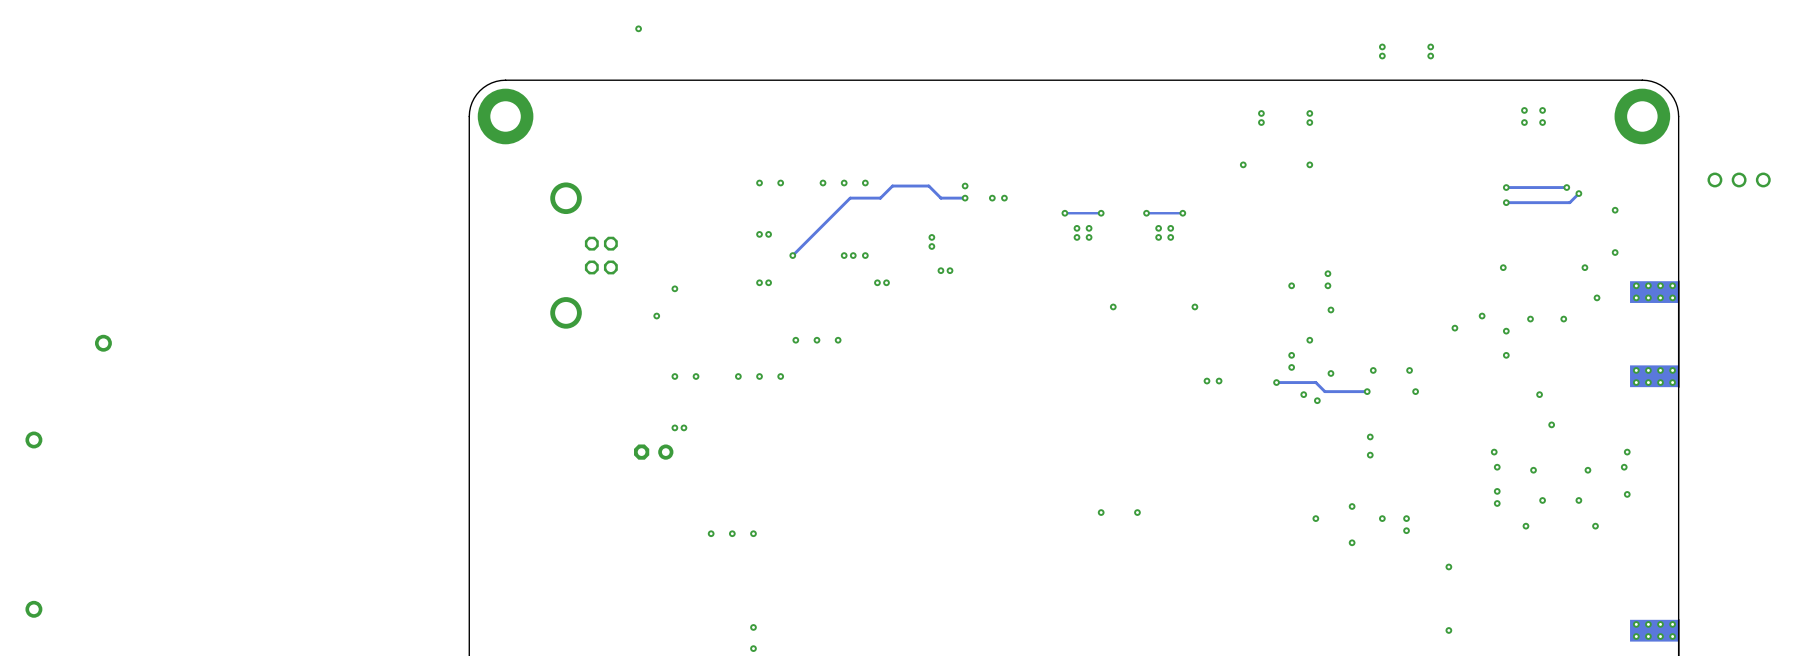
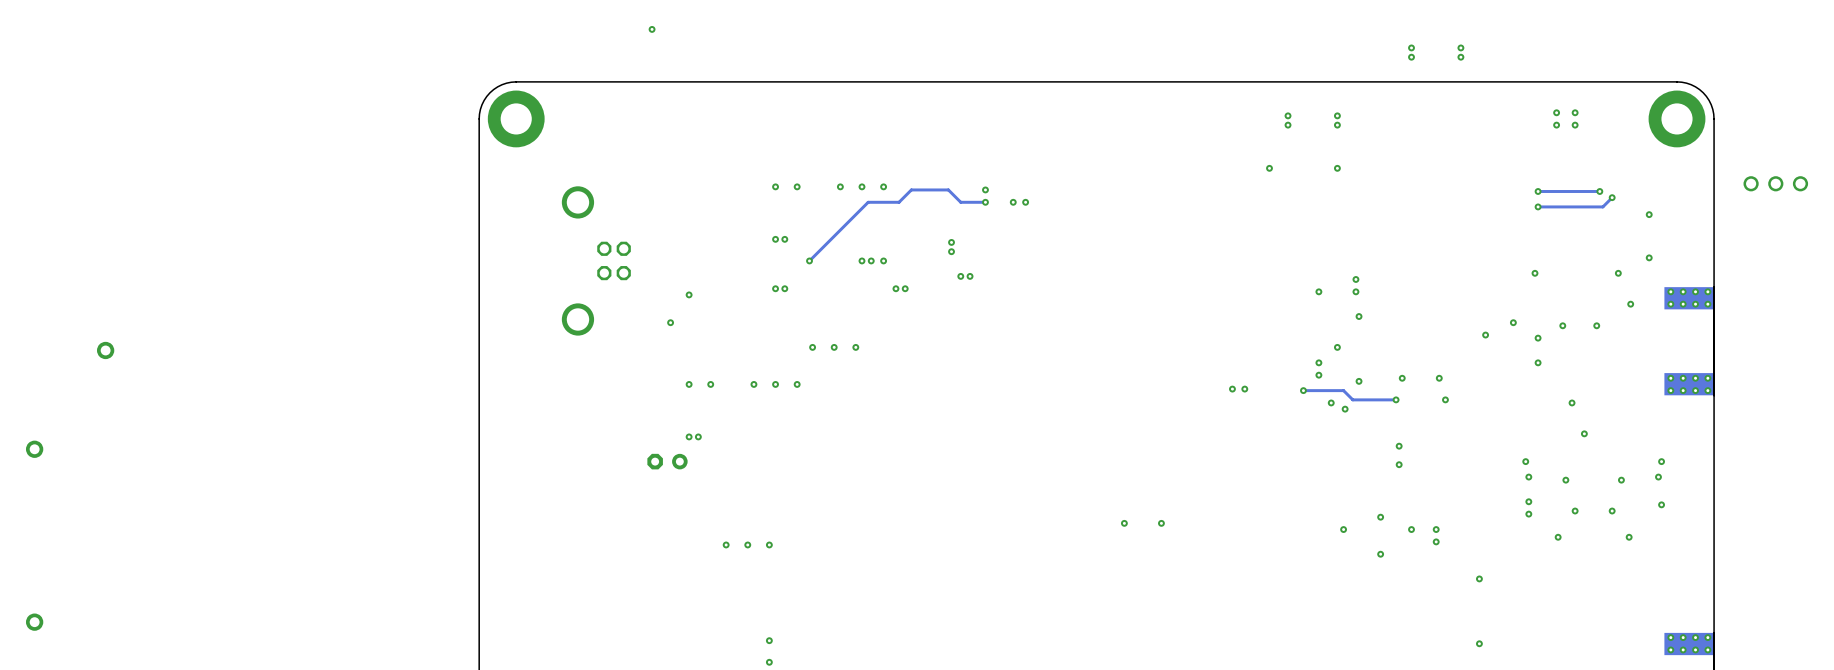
via: (1064, 213) -> none
track: (1101, 213) (1064, 213) -> none
via: (1101, 213) -> none
via: (1146, 213) -> none
track: (1182, 213) (1146, 213) -> none
via: (1182, 213) -> none
via: (1076, 228) -> none
via: (1089, 228) -> none
via: (1158, 228) -> none
via: (1170, 228) -> none
via: (1076, 237) -> none
via: (1089, 237) -> none
via: (1158, 237) -> none
via: (1170, 237) -> none
via: (1113, 306) -> none
via: (1194, 306) -> none

